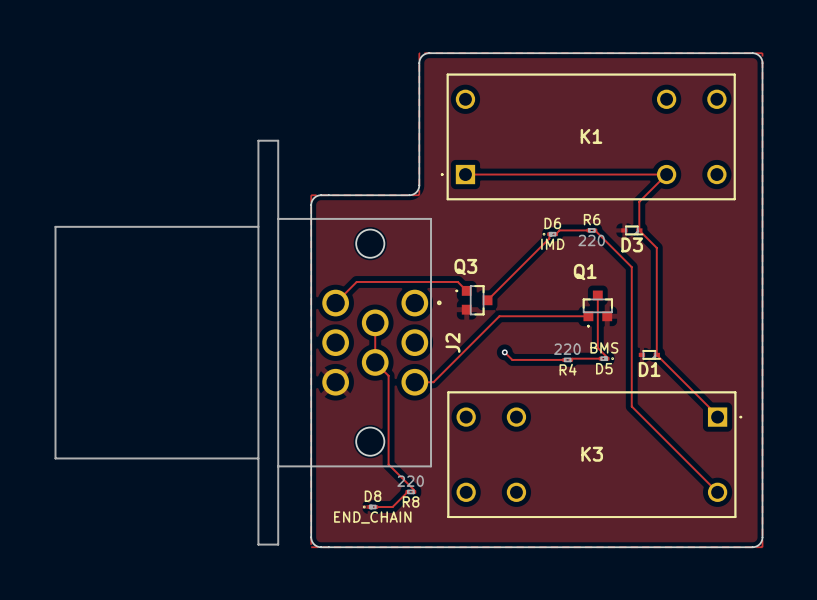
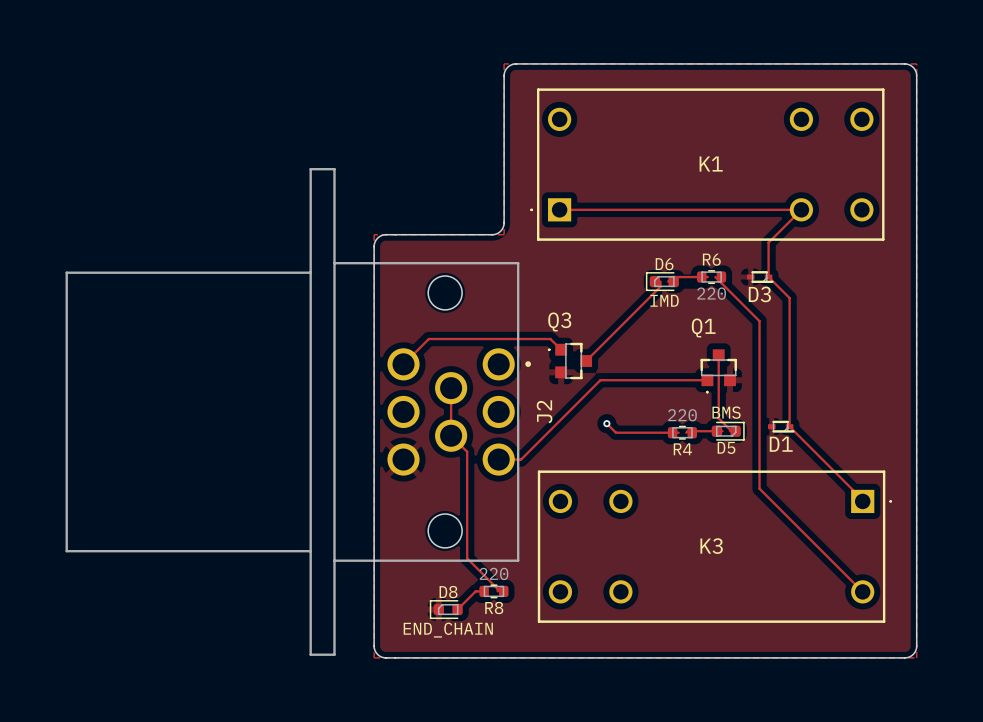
R6 footprint: [586, 228, 598, 233] -> [697, 270, 727, 284]
D6 footprint: [543, 232, 559, 237] -> [645, 272, 679, 292]
D5 footprint: [598, 356, 614, 361] -> [711, 421, 745, 441]
R4 footprint: [562, 357, 574, 362] -> [667, 425, 698, 440]
R8 footprint: [405, 489, 417, 494] -> [479, 584, 509, 599]
track: none -> (484, 591) (475, 591) (457, 609)
track: (407, 491) (392, 507) (375, 507) -> none
D8 footprint: [363, 505, 379, 509] -> [429, 600, 463, 620]

